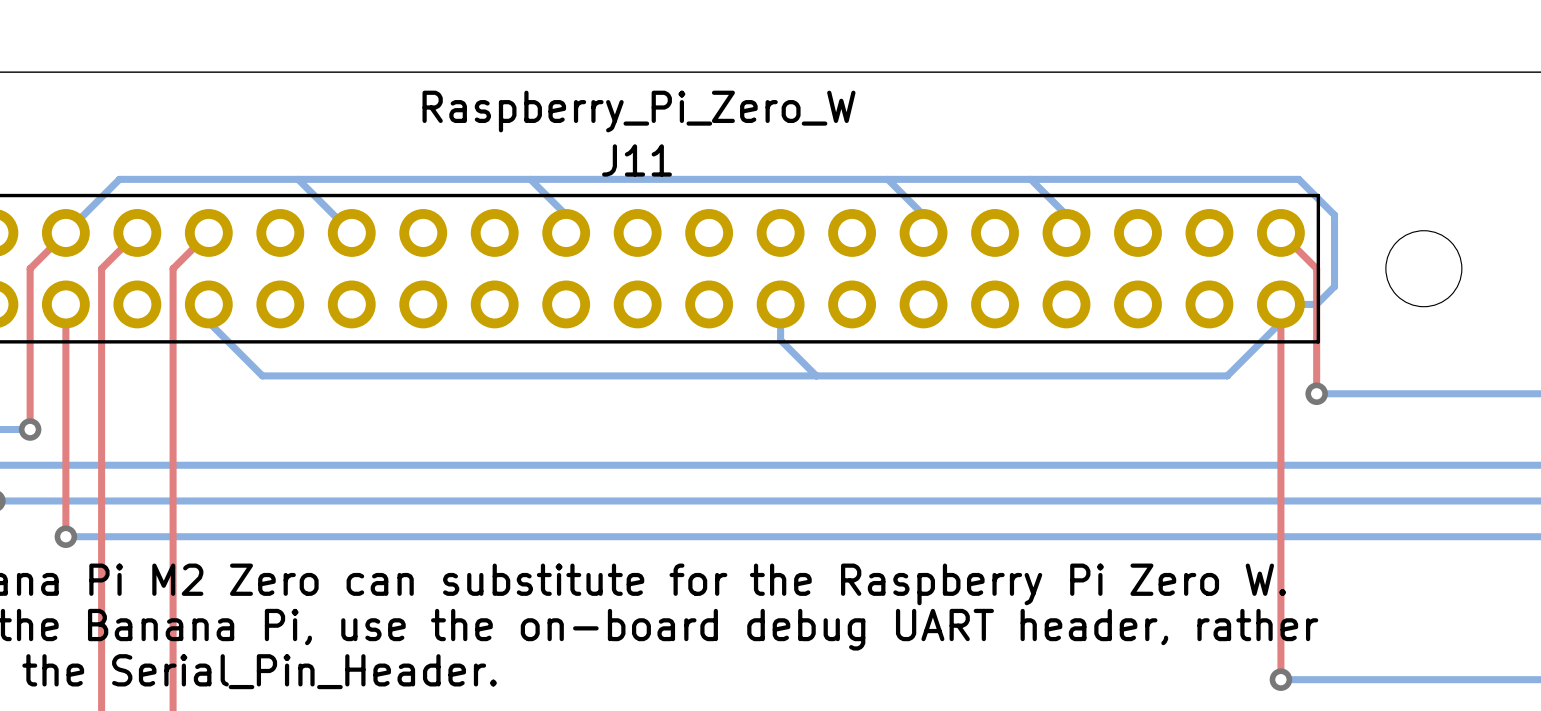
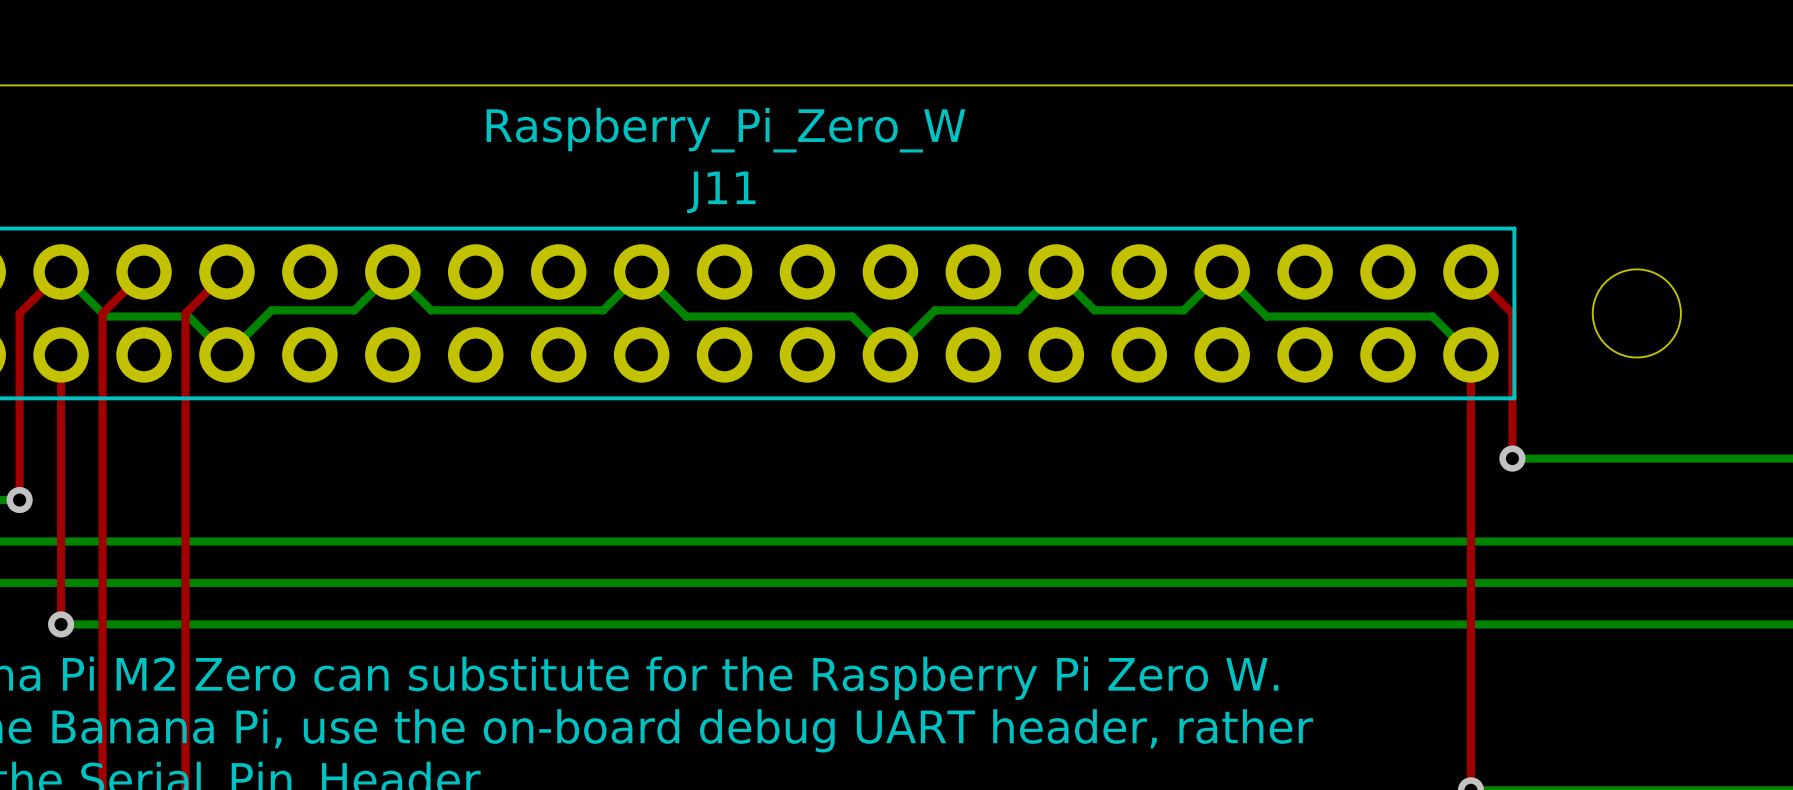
bottom track: (298, 179) (351, 232) -> none
bottom track: (530, 179) (566, 215) (566, 232) -> none
bottom track: (887, 179) (923, 215) (923, 232) -> none
bottom track: (1030, 179) (1066, 215) (1066, 232) -> none
bottom track: (65, 232) (119, 179) (1298, 179) (1334, 215) (1334, 286) (1316, 304) (1280, 304) (1280, 322) (1227, 375) (262, 375) (208, 322) (208, 304) -> (61, 271) (105, 316) (188, 316) (226, 354) (271, 310) (354, 310) (392, 271) (431, 310) (603, 310) (641, 271) (686, 316) (852, 316) (890, 354) (934, 310) (1017, 310) (1056, 271) (1094, 310) (1183, 310) (1222, 271) (1266, 316) (1432, 316) (1470, 354)
bottom track: (780, 304) (780, 340) (816, 375) -> none

